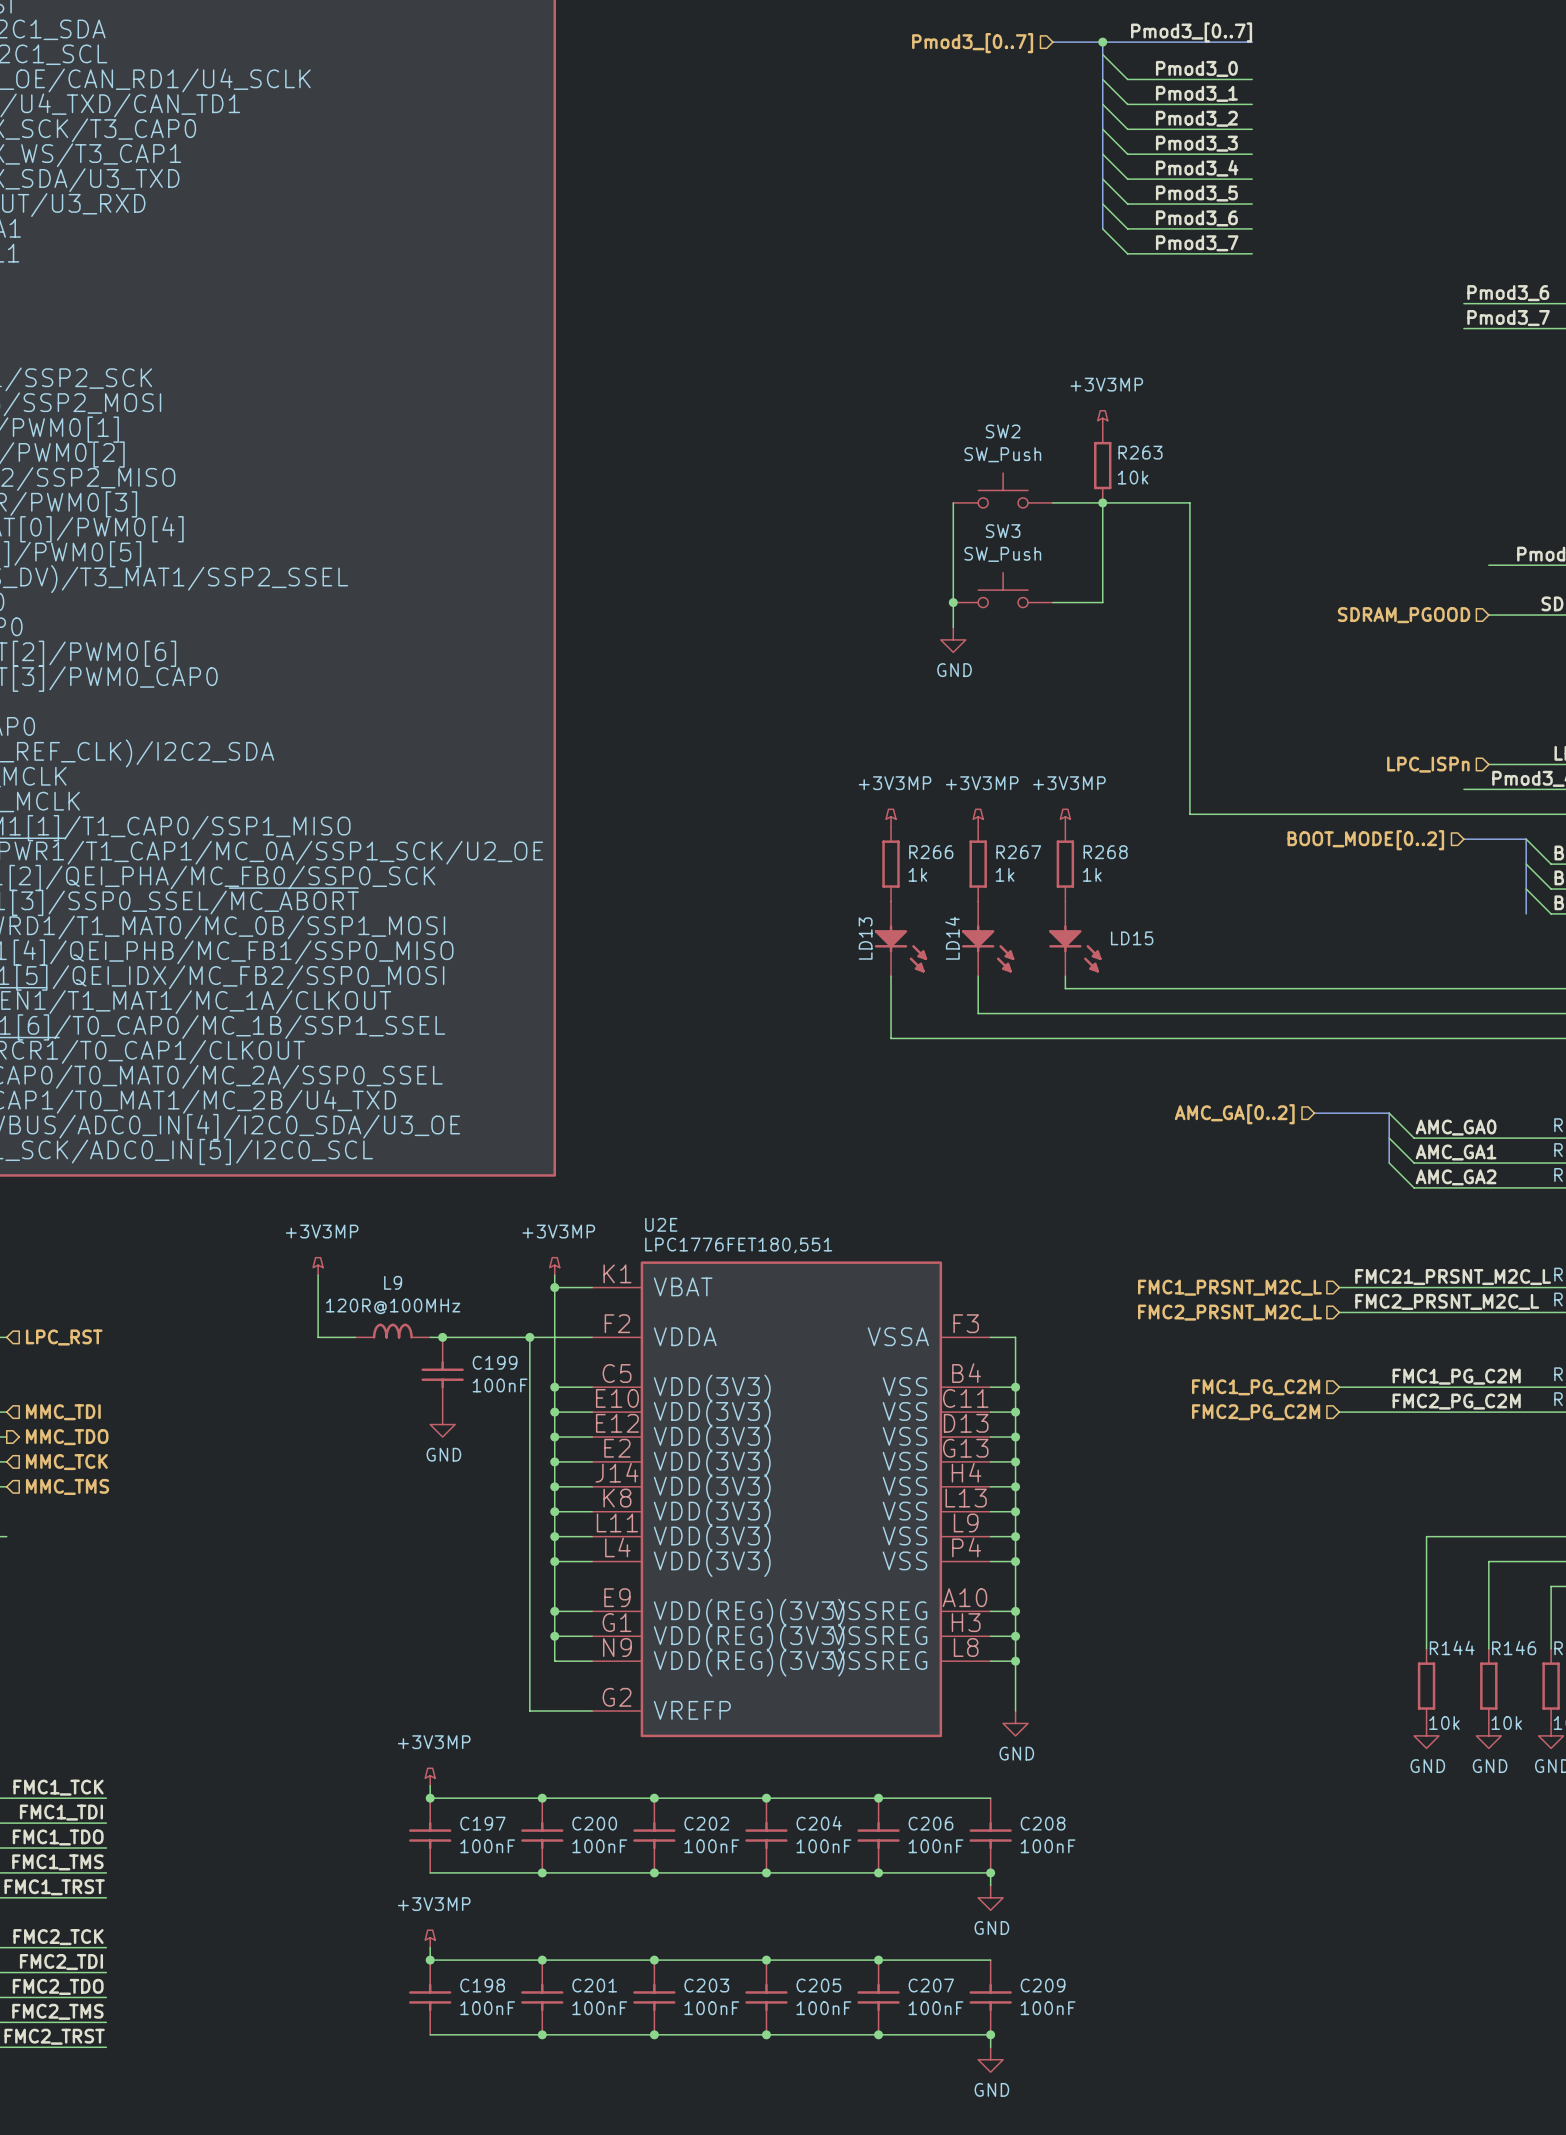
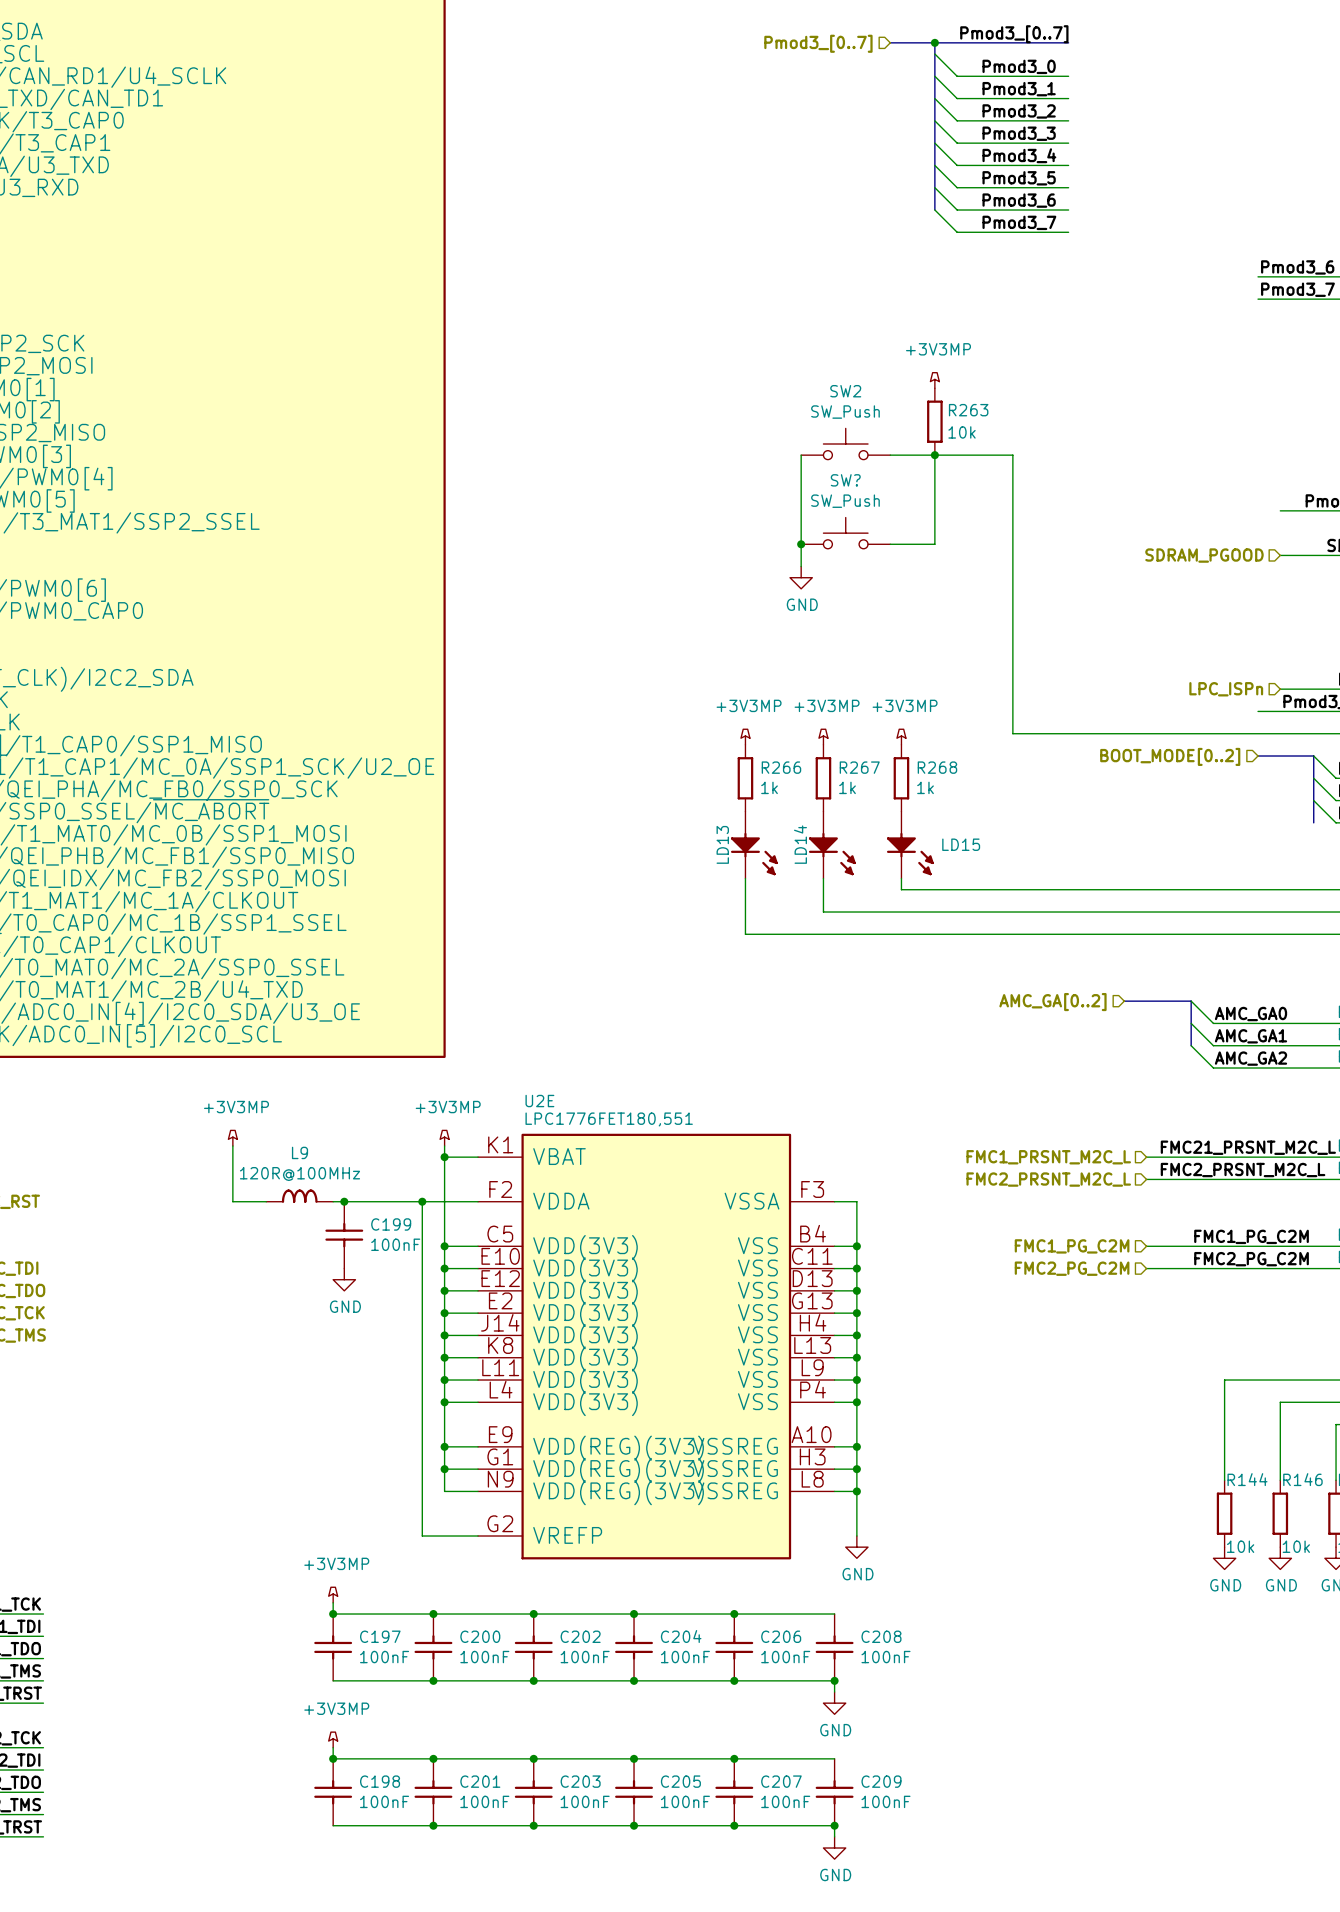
SW3 name: SW3 (1003, 531) -> SW? (845, 480)

